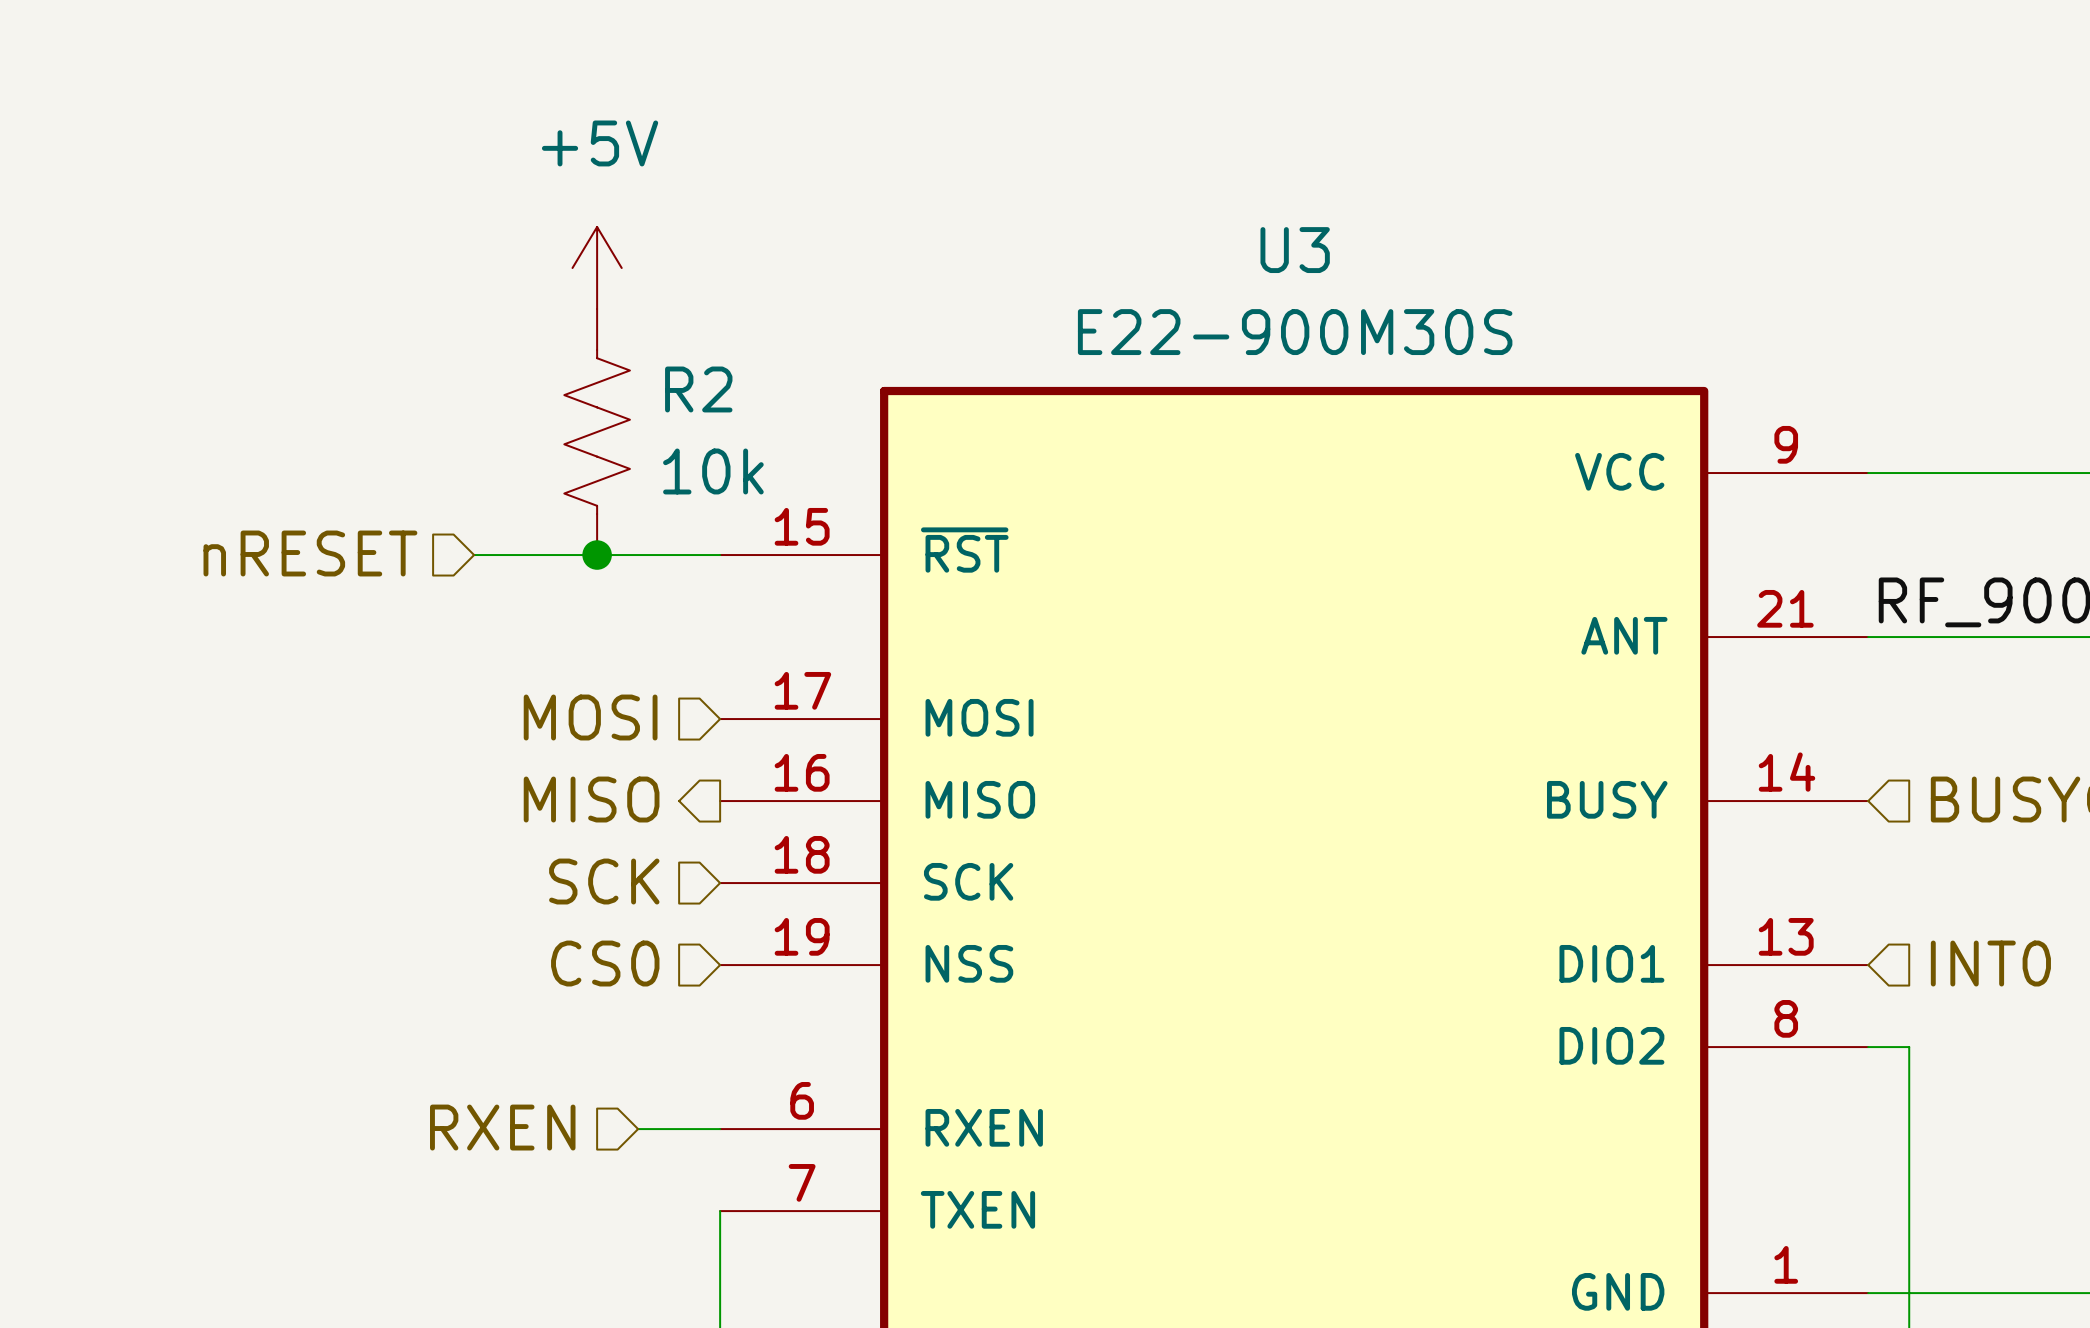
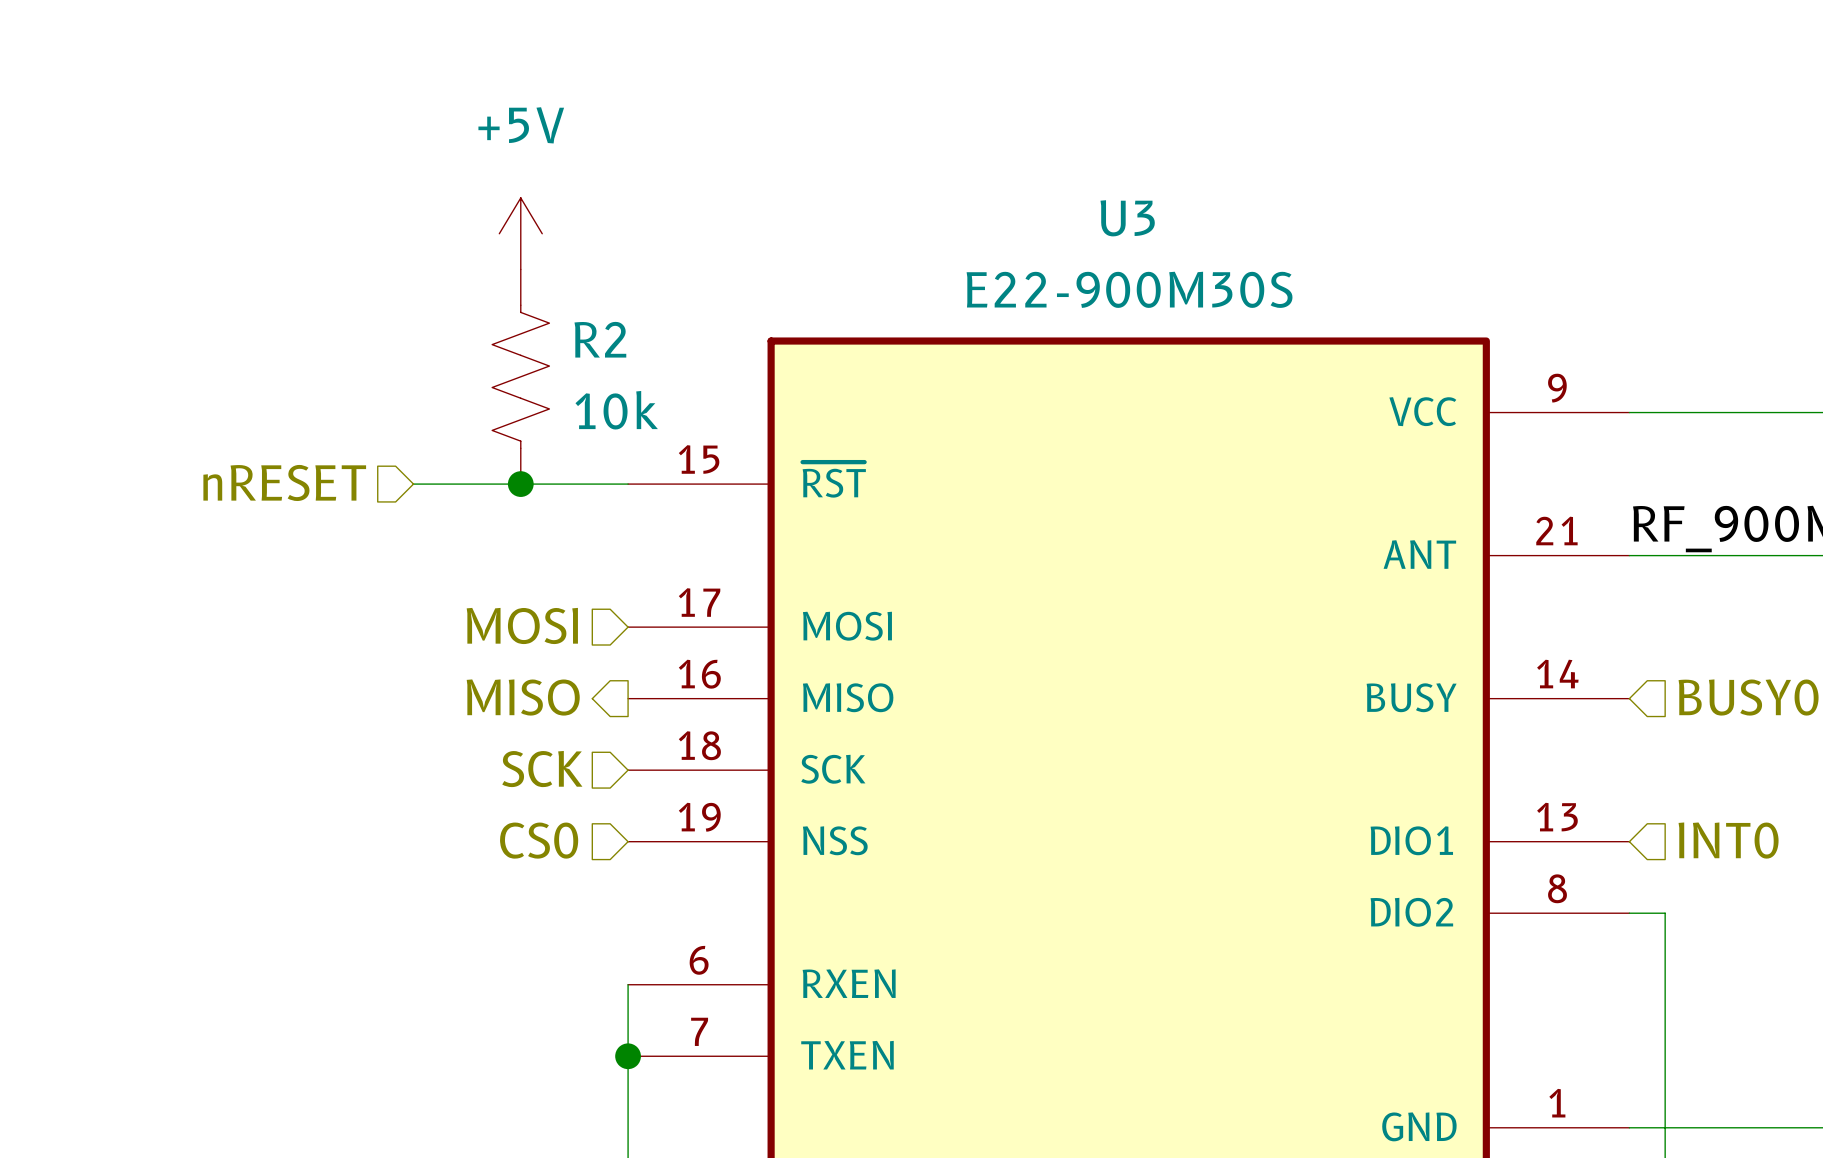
hierarchical label: RXEN (502, 1127) -> none
wire: (638, 1129) (720, 1129) -> (628, 1056) (628, 984)
junction: none -> (628, 1056)

